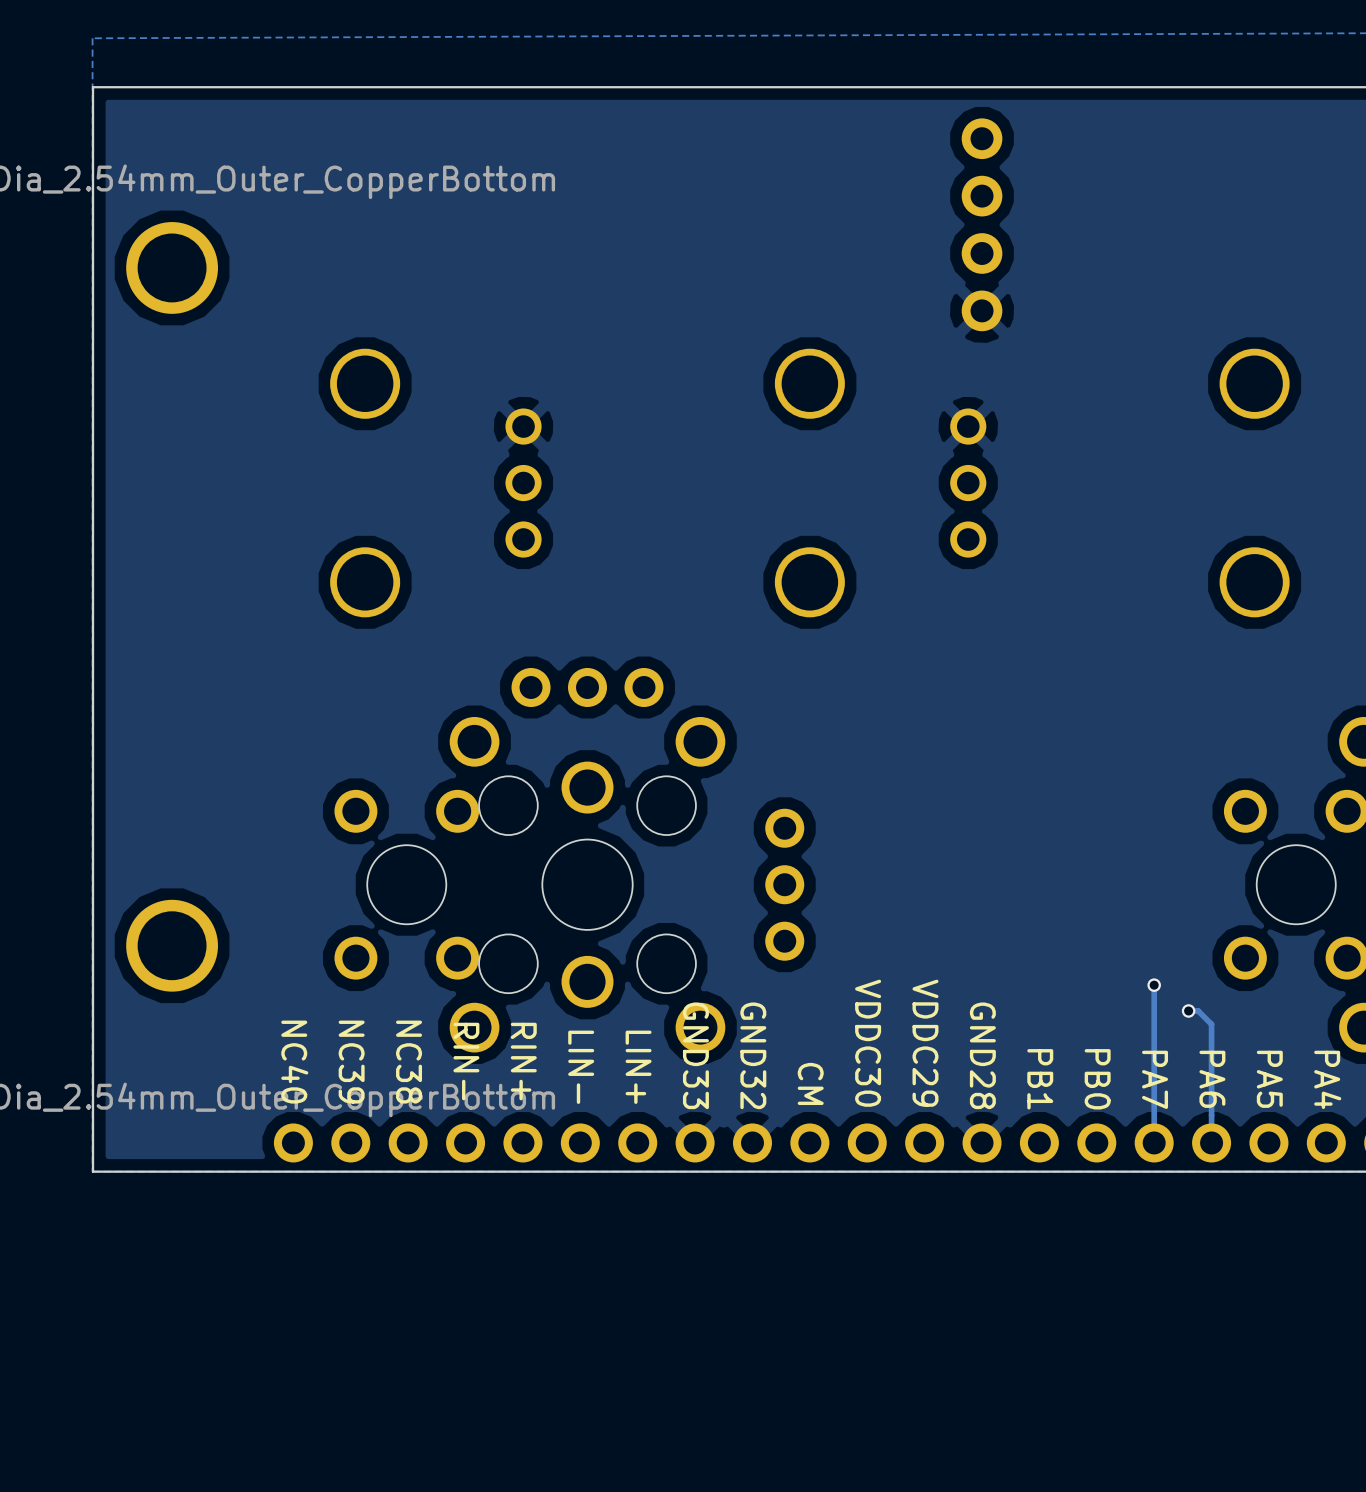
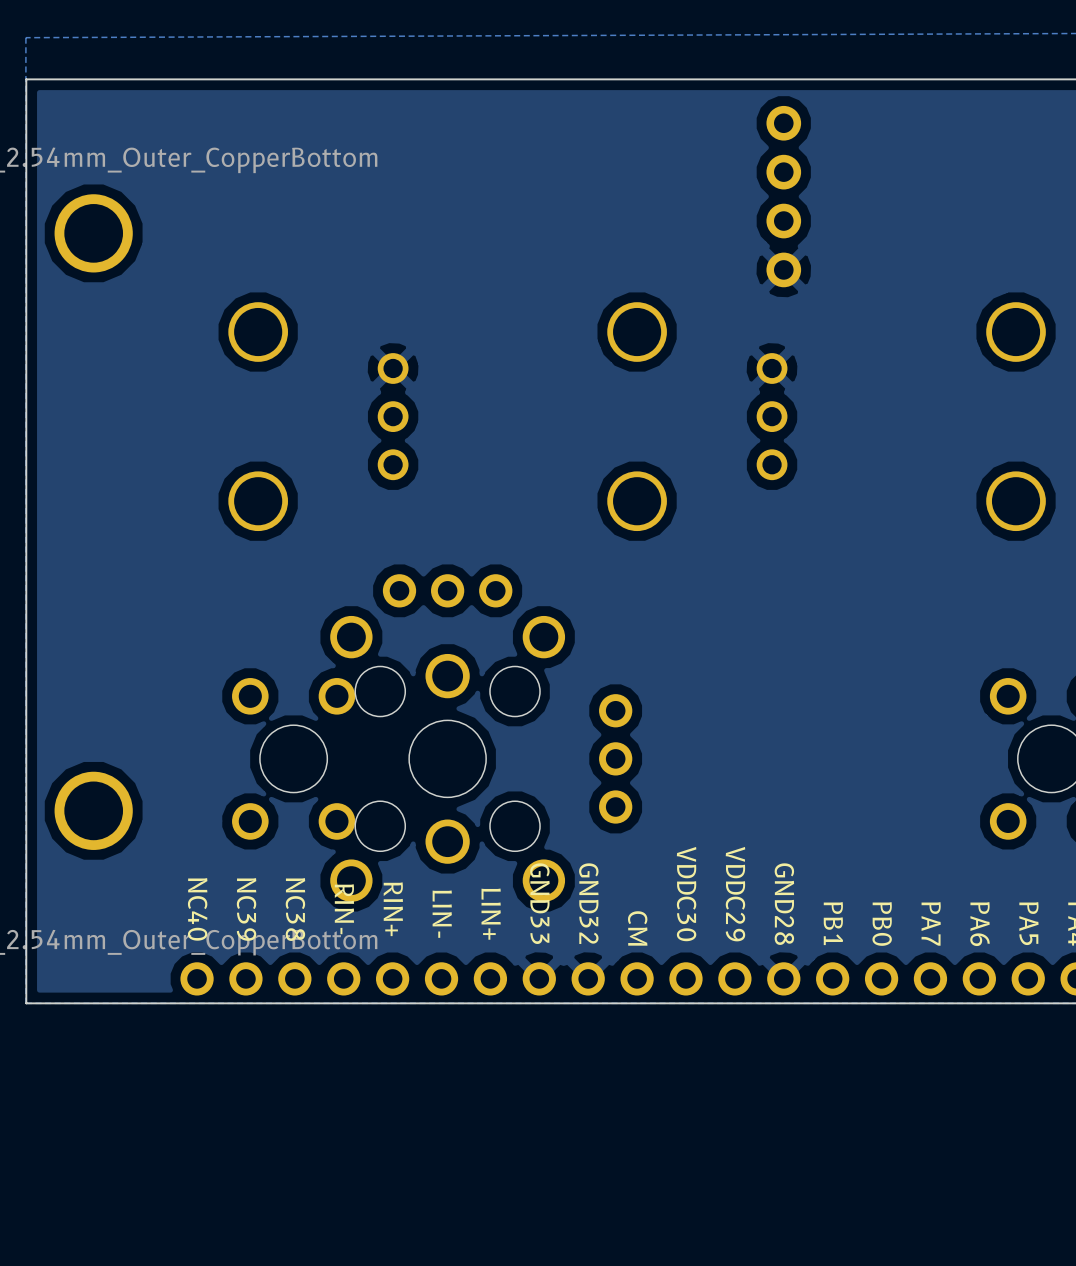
track: (1154, 985) (1154, 1142) -> none
via: (1154, 985) -> none
track: (1188, 1010) (1198, 1010) (1211, 1024) (1211, 1142) -> none
via: (1188, 1010) -> none

